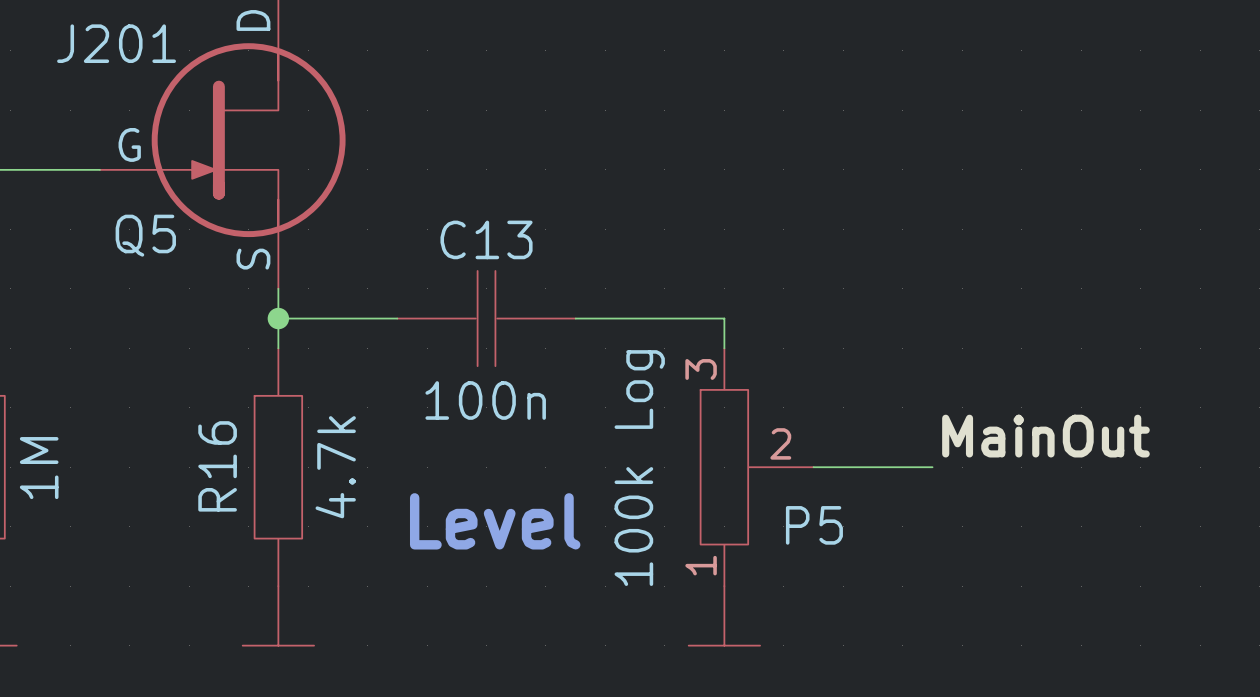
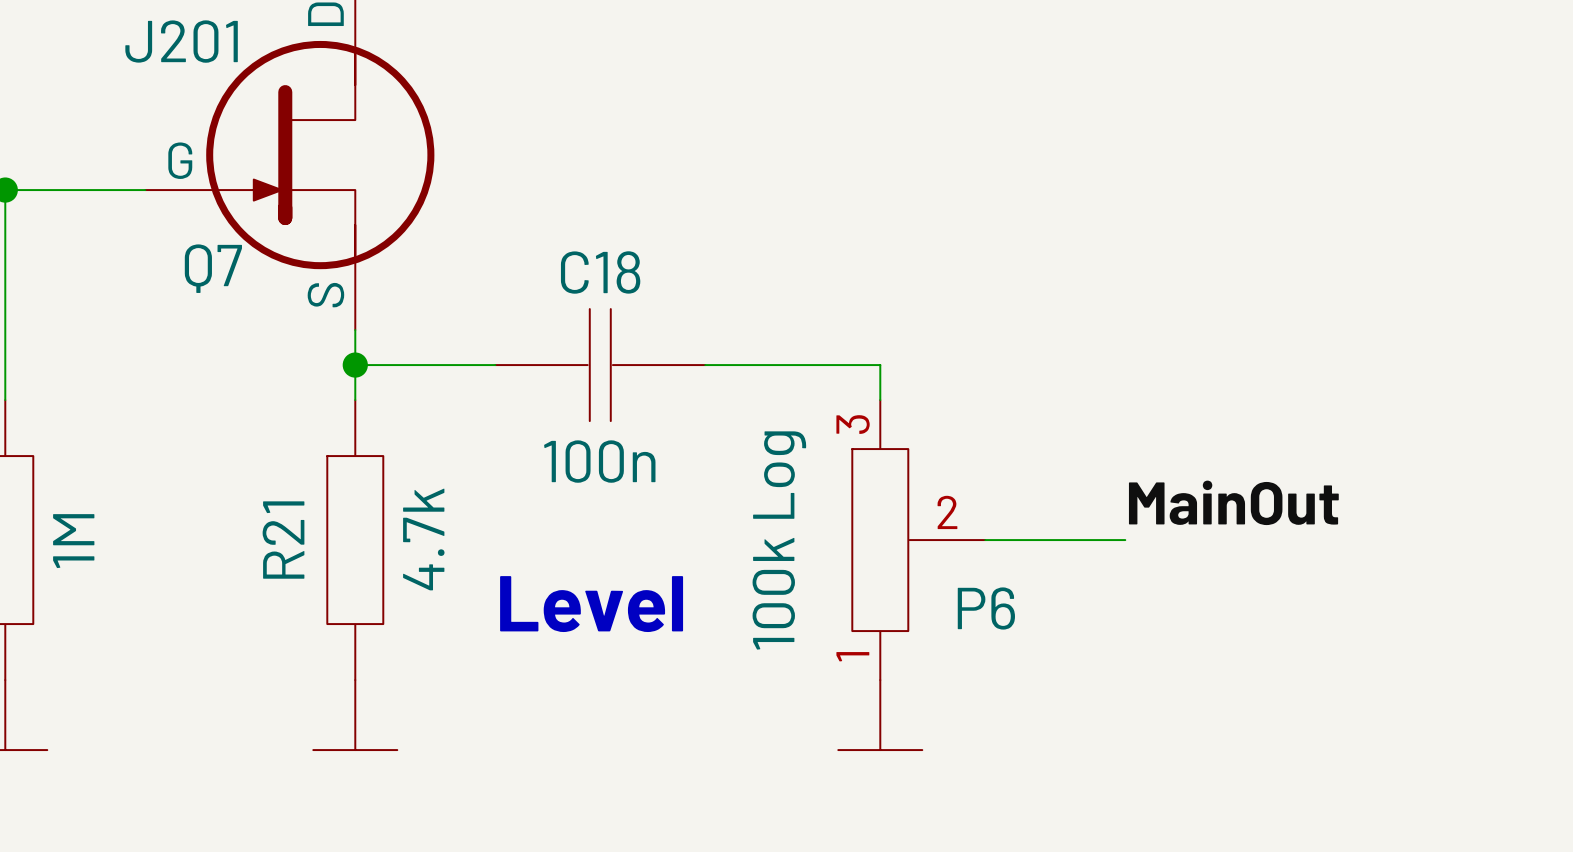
Q5 name: Q5 (145, 235) -> Q7 (213, 268)
C13 name: C13 (486, 239) -> C18 (600, 272)
R16 name: R16 (217, 466) -> R21 (283, 540)
P5 name: P5 (814, 525) -> P6 (986, 608)

